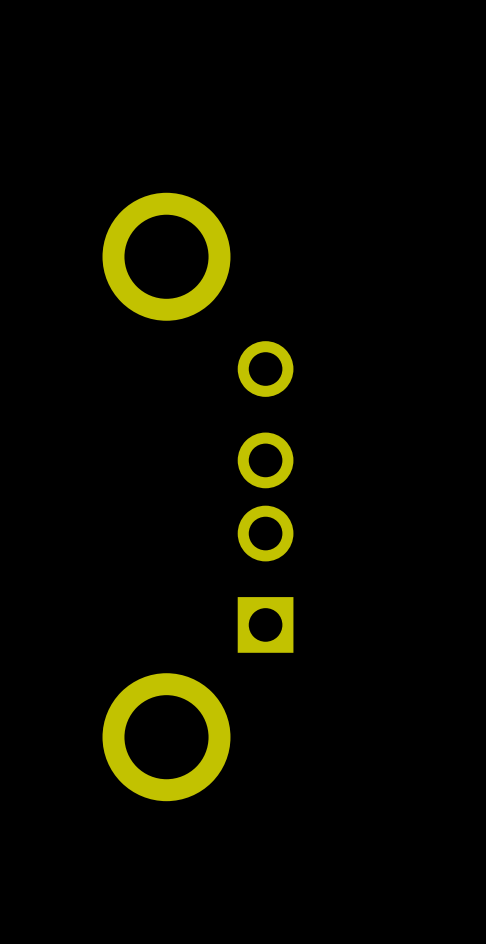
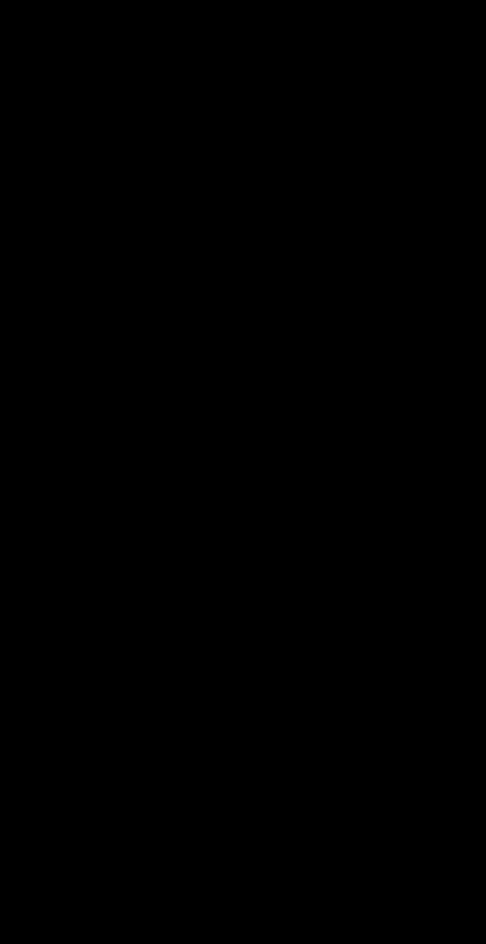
part: (197, 496) -> none

